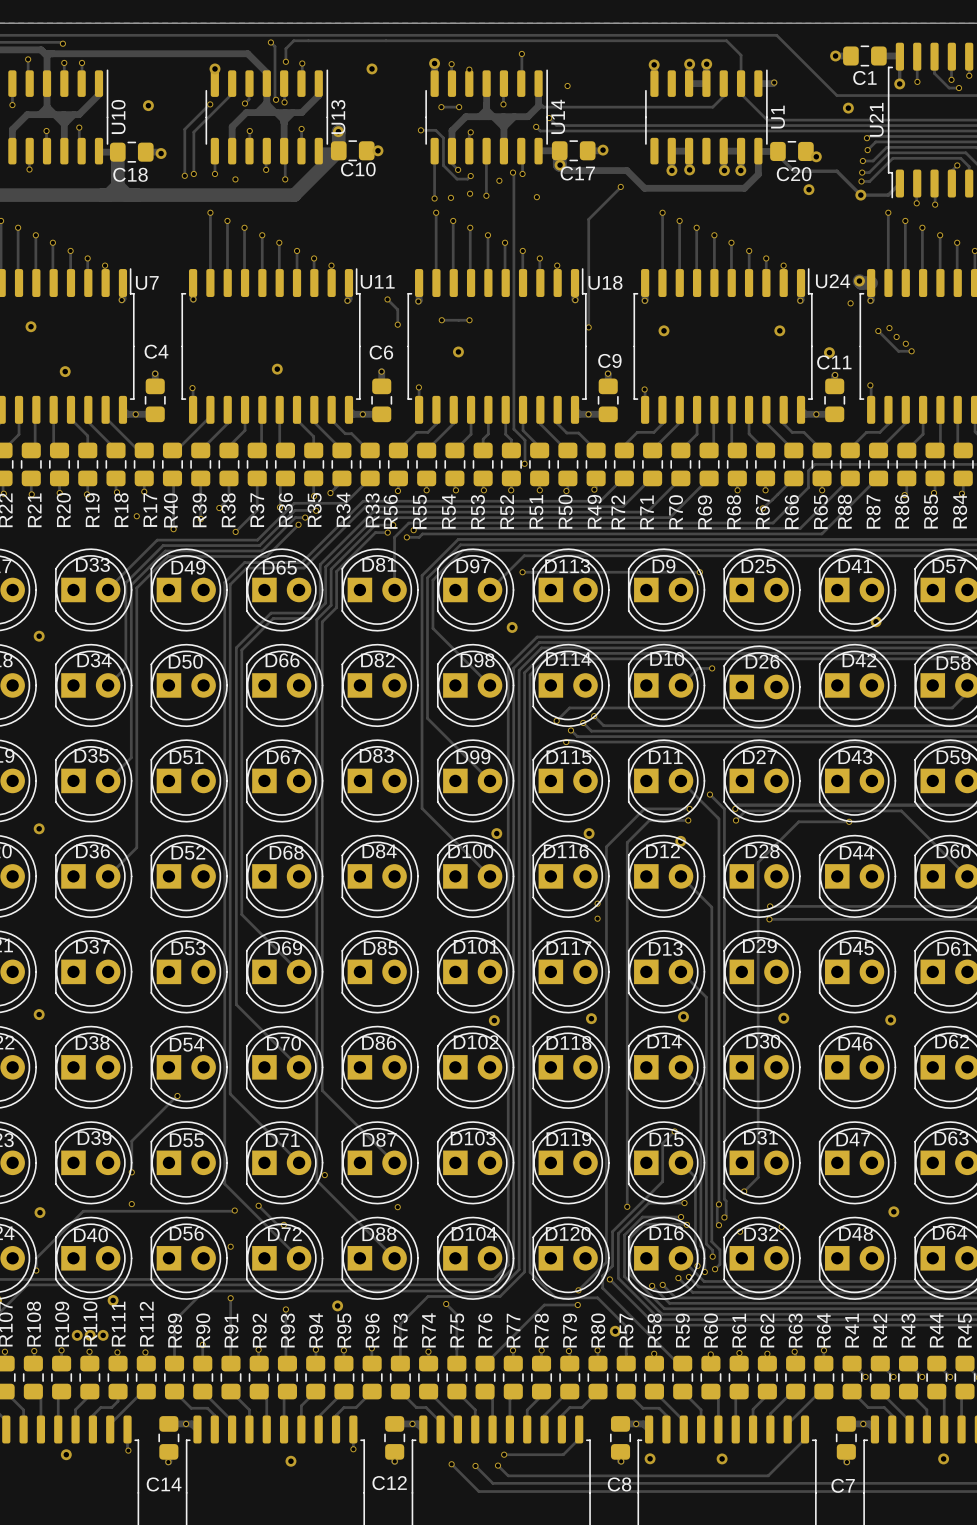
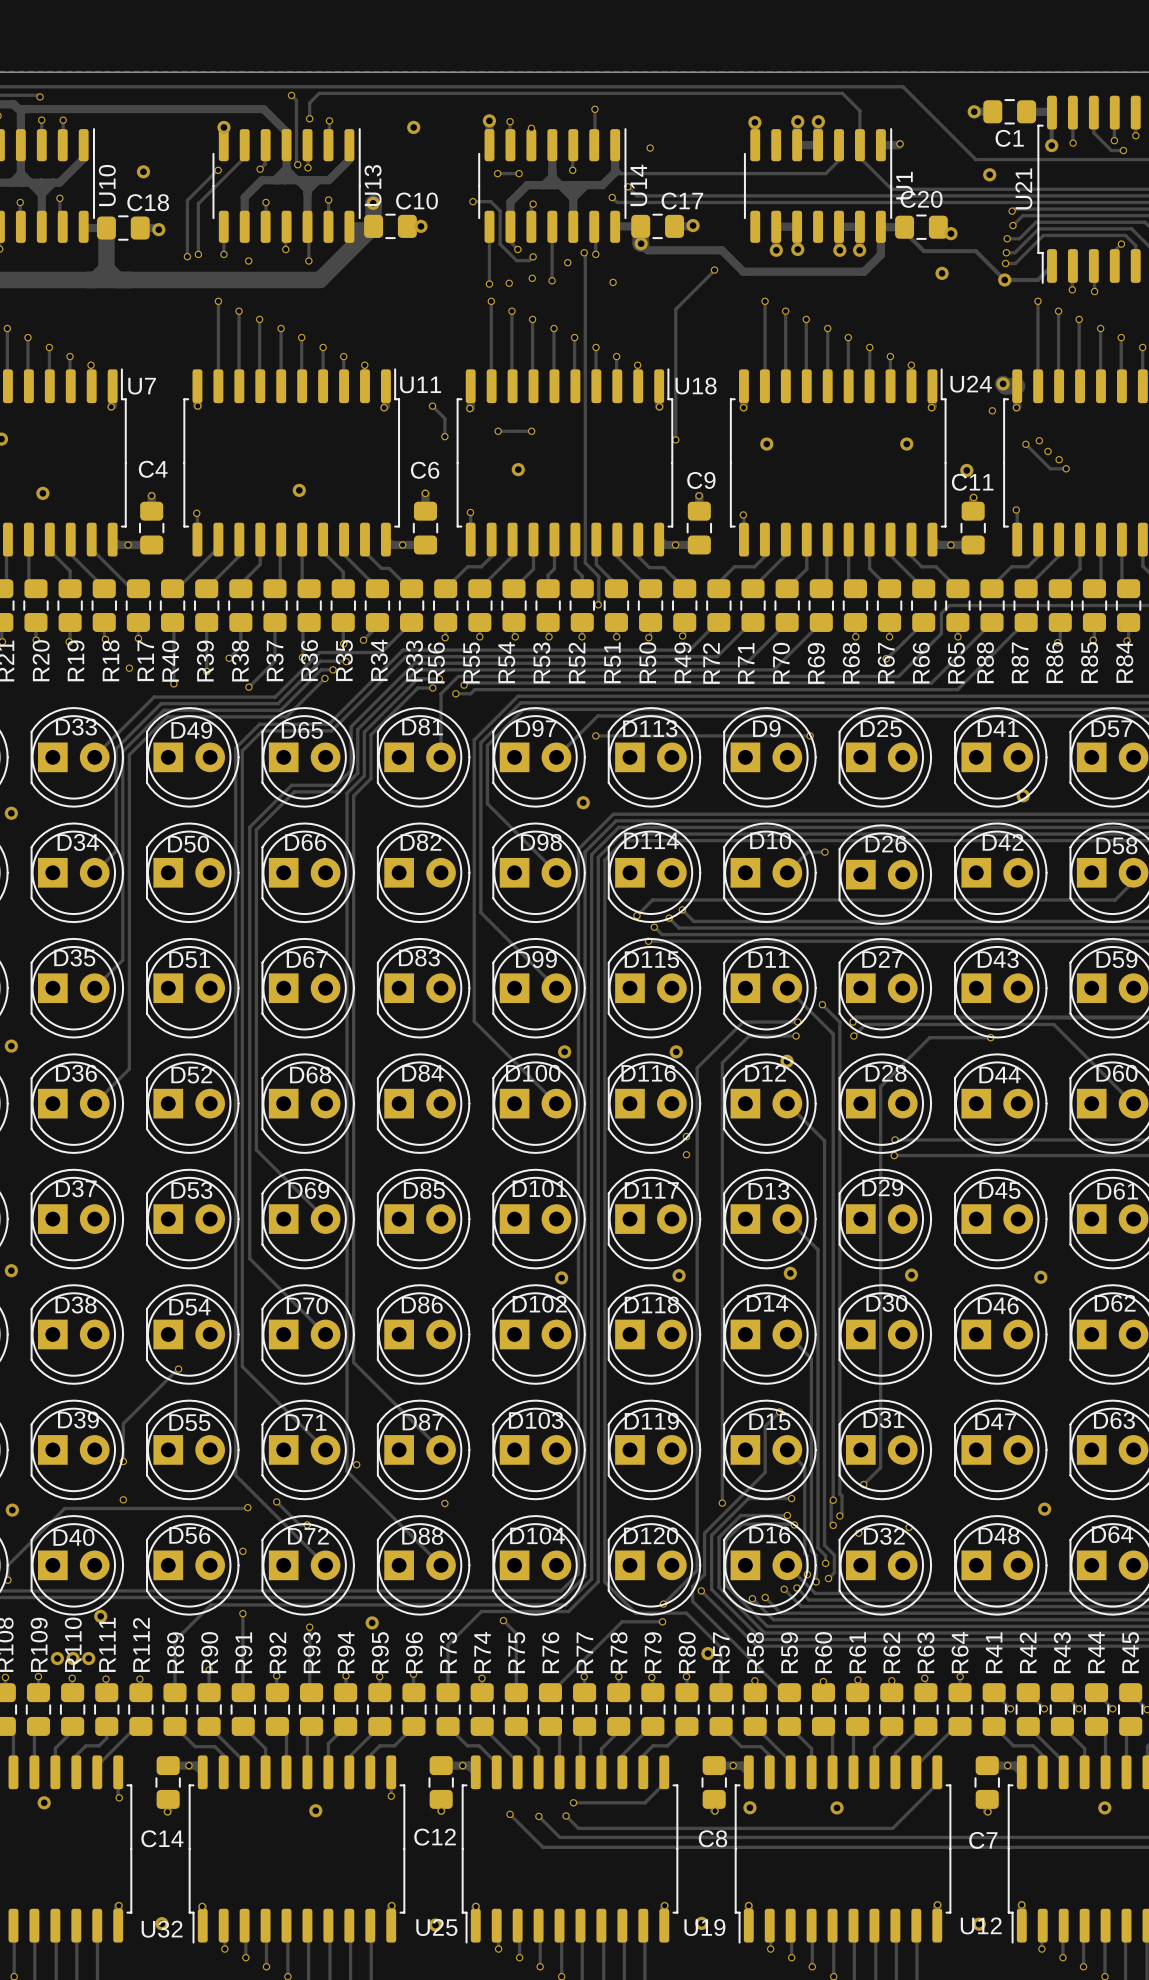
C10 name position: C10 (358, 169) -> C10 (417, 201)
C17 name position: C17 (577, 173) -> C17 (682, 201)
C18 name position: C18 (130, 174) -> C18 (148, 202)
C20 name position: C20 (794, 174) -> C20 (921, 199)

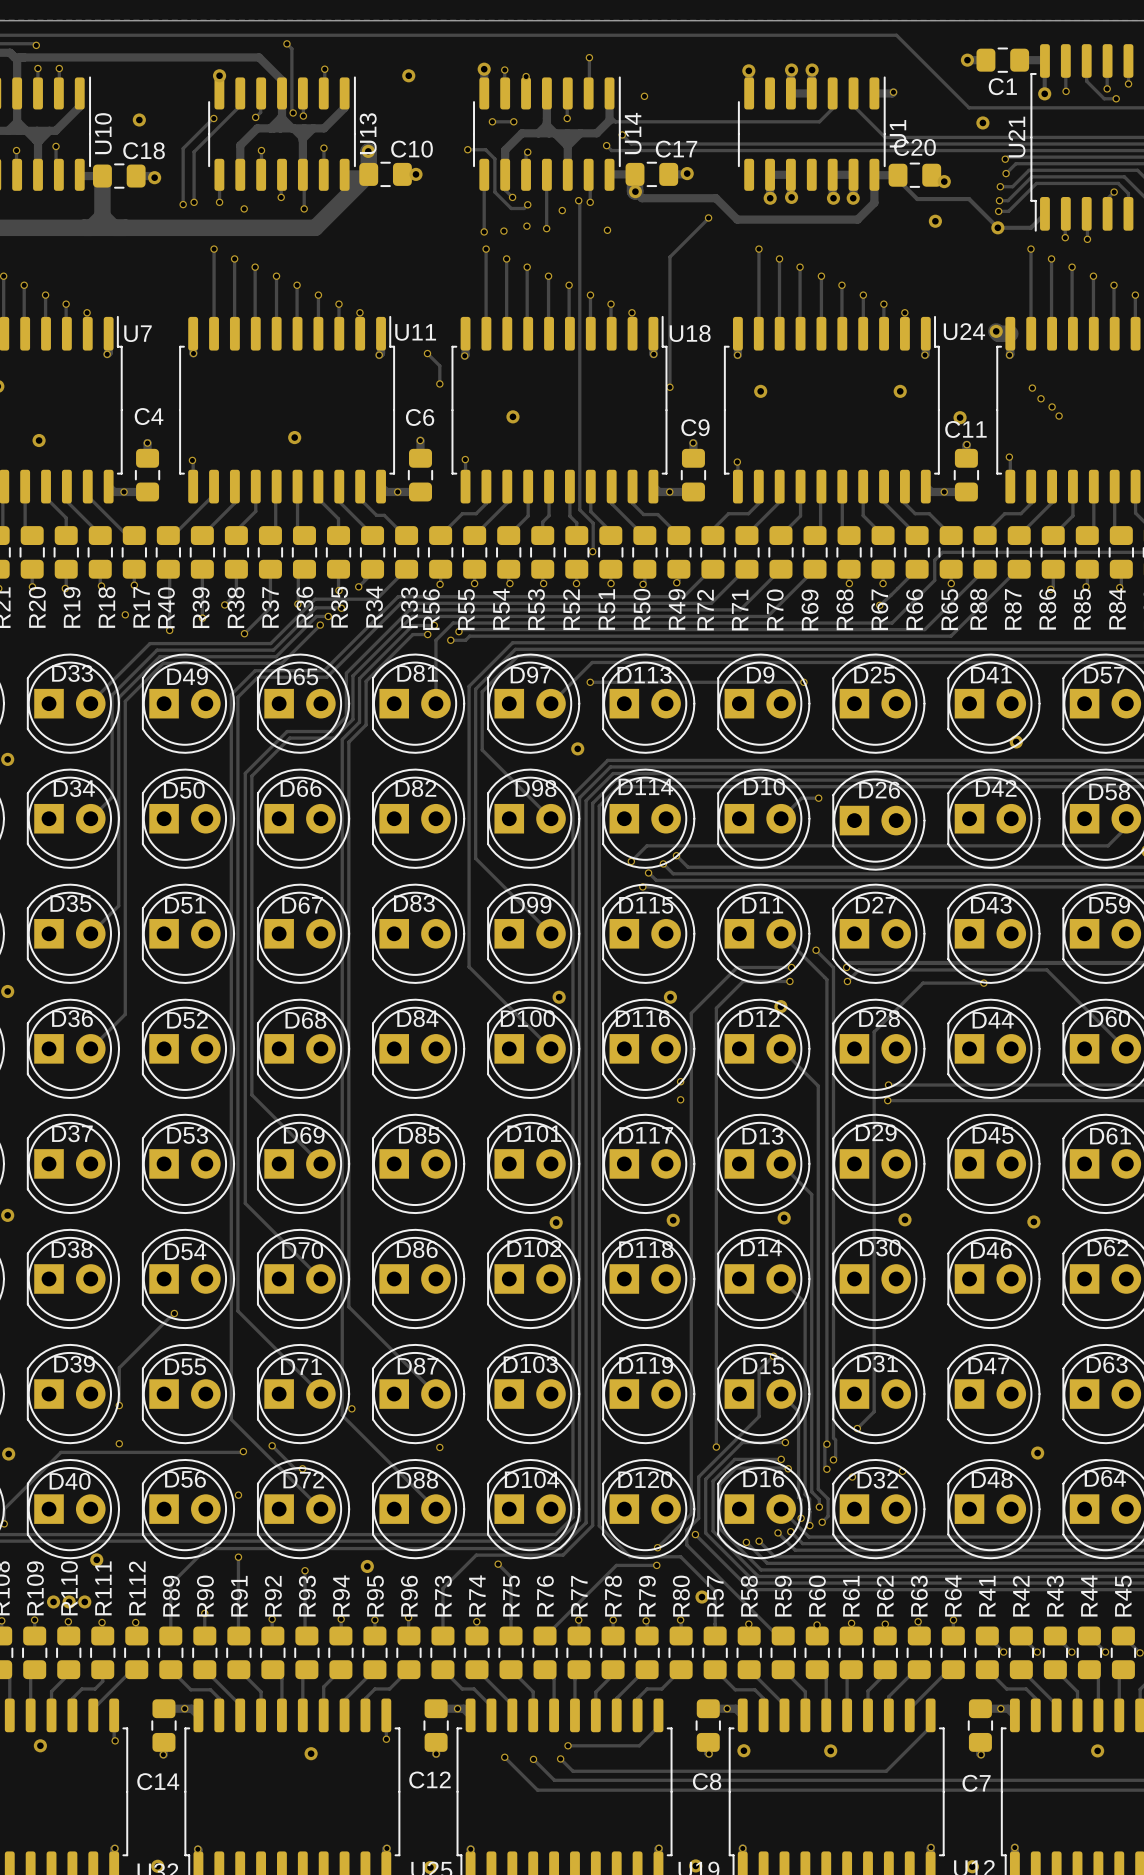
track: (309, 118) (309, 102) (319, 93) (842, 93) (859, 110) (859, 145) -> none
via: (309, 118) -> none
via: (992, 410) -> none
track: (498, 431) (531, 431) -> none
via: (498, 431) -> none
via: (531, 431) -> none
track: (1025, 444) (1050, 468) (1066, 468) -> none
via: (1025, 444) -> none

